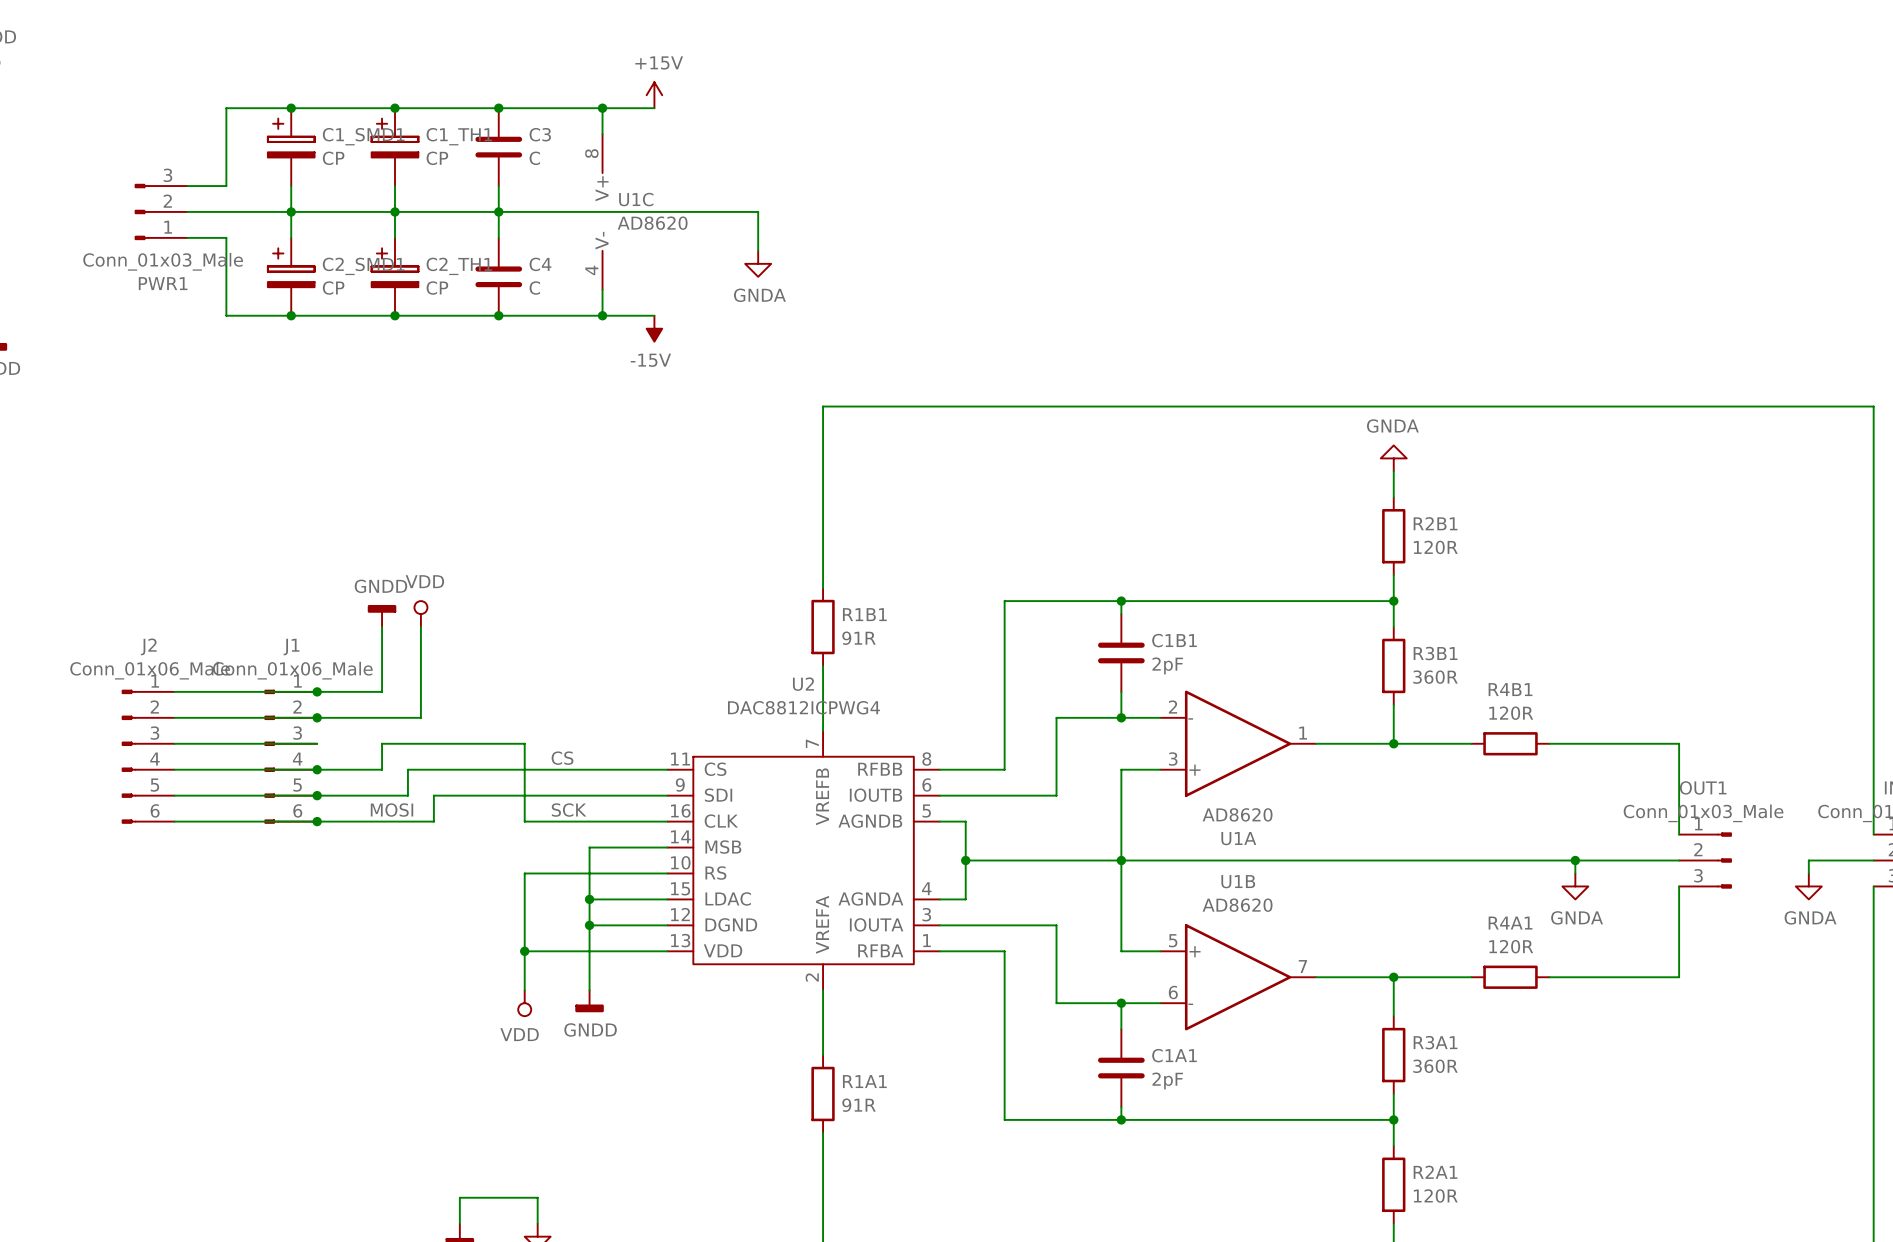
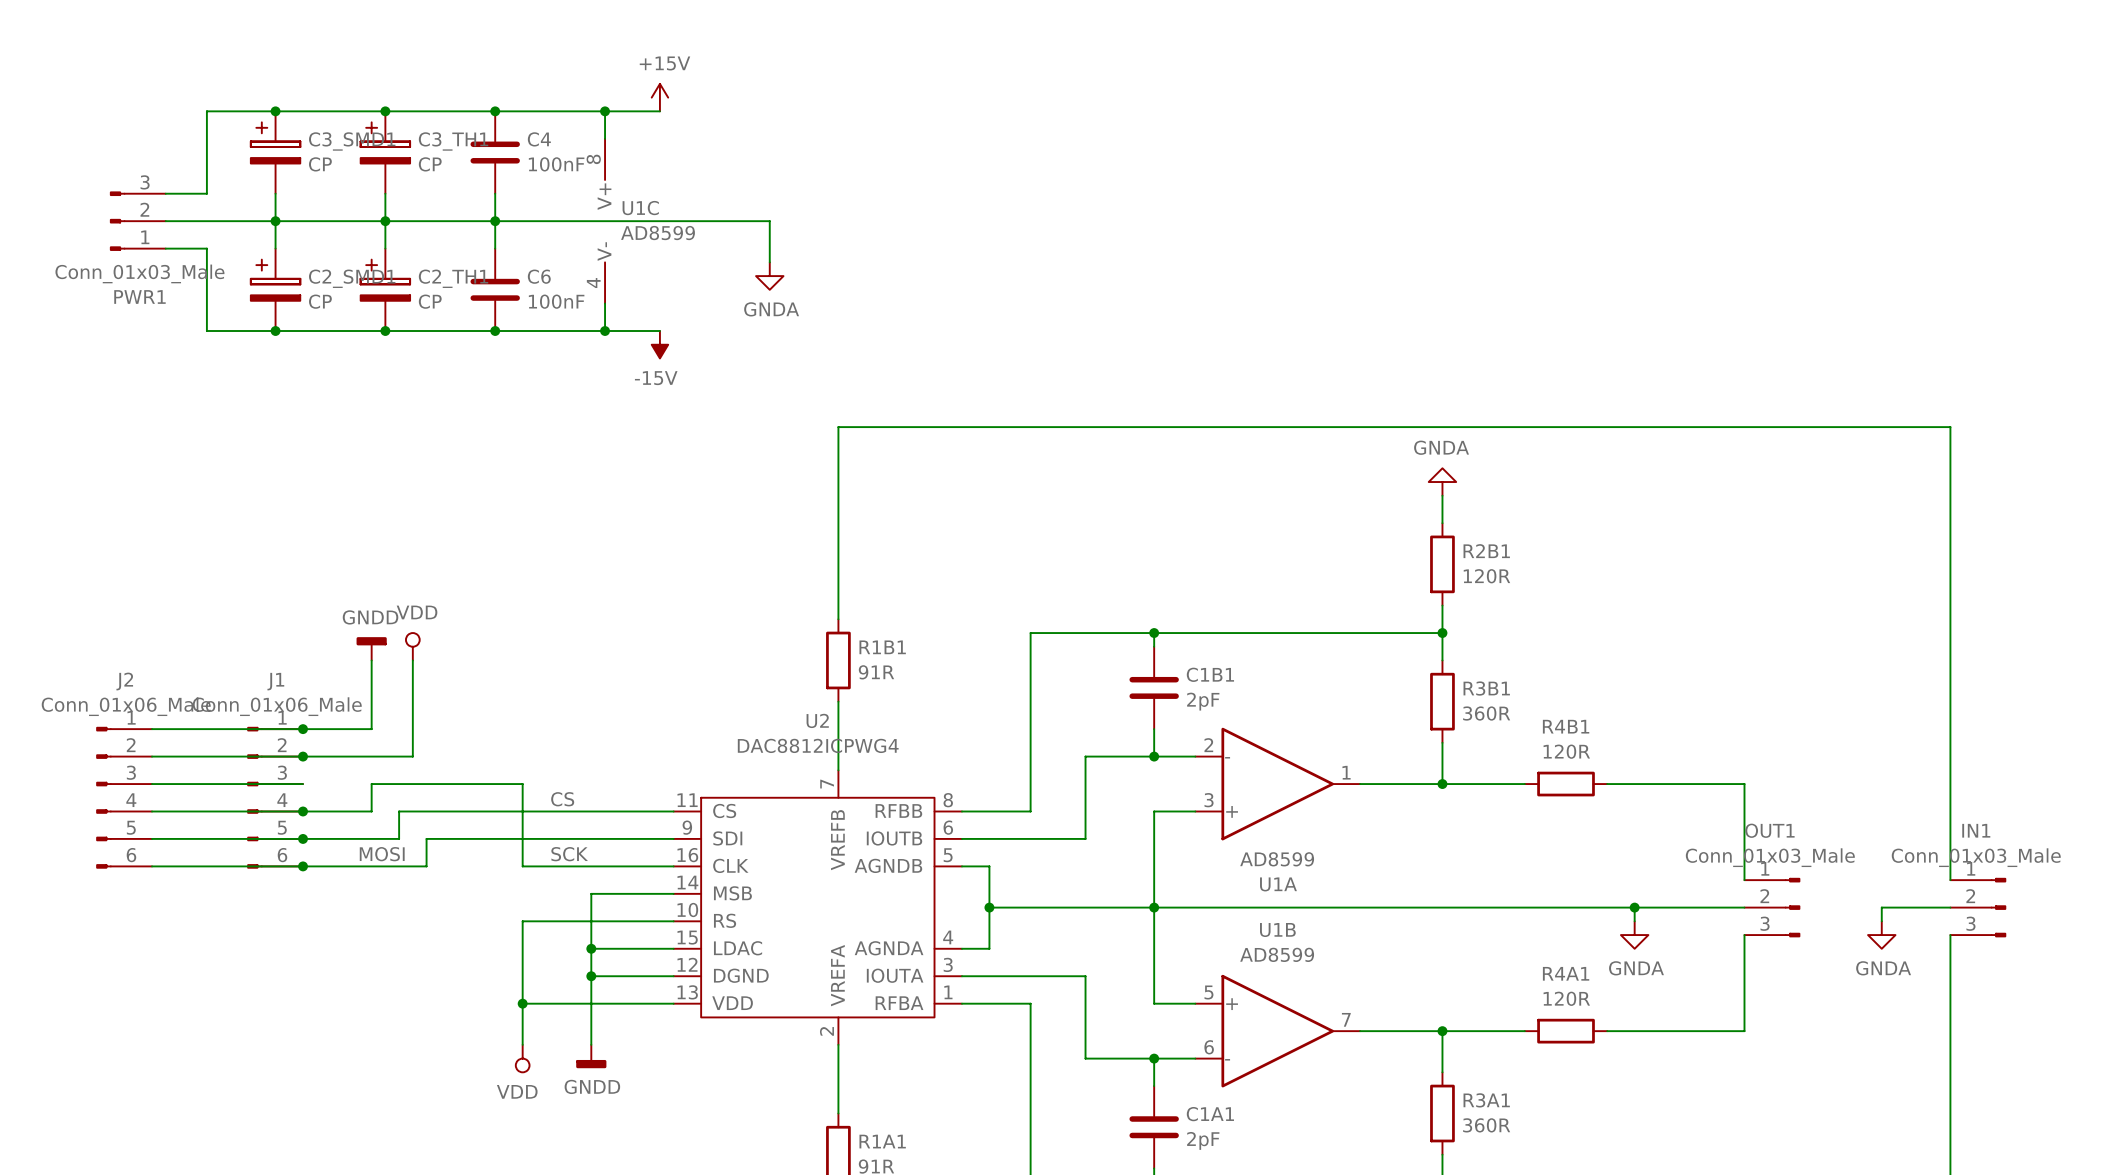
C3 name: C3 (540, 134) -> C4 (539, 139)
C1_SMD1 name: C1_SMD1 (363, 136) -> C3_SMD1 (352, 141)
C1_TH1 name: C1_TH1 (459, 136) -> C3_TH1 (453, 141)
C3 value: C (534, 158) -> 100nF (556, 164)
U1C value: AD8620 (652, 223) -> AD8599 (658, 233)
C4 name: C4 (540, 264) -> C6 (539, 276)
C4 value: C (534, 288) -> 100nF (556, 301)
U1A value: AD8620 (1237, 814) -> AD8599 (1277, 859)
U1B value: AD8620 (1237, 905) -> AD8599 (1277, 954)

